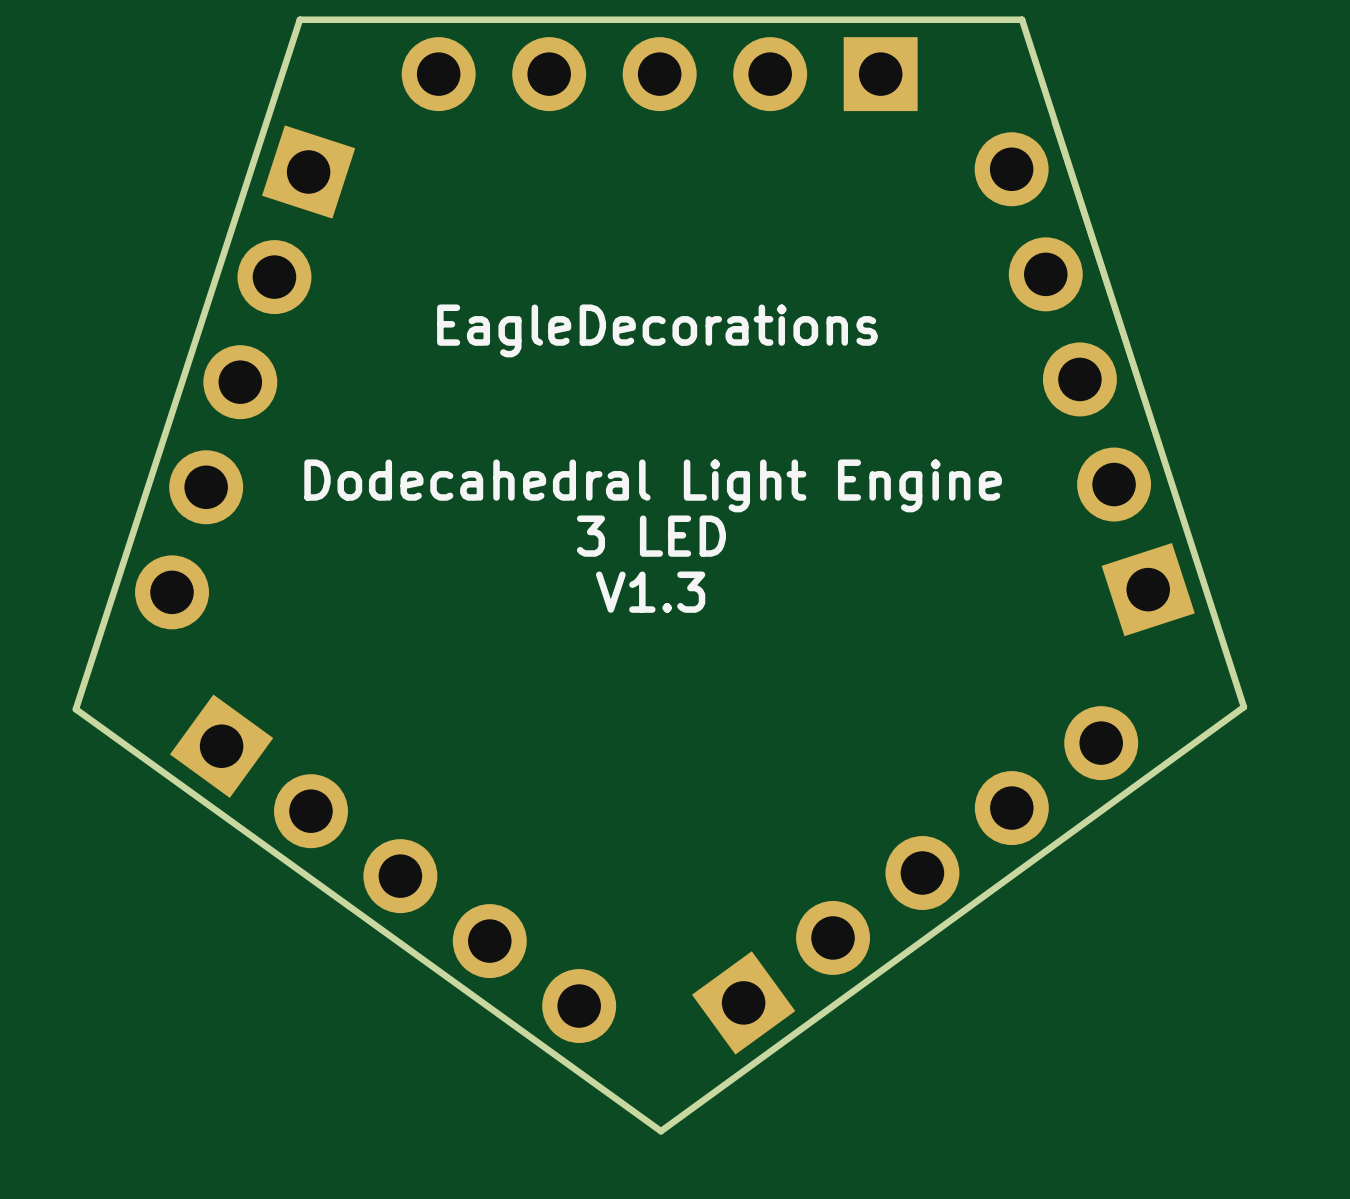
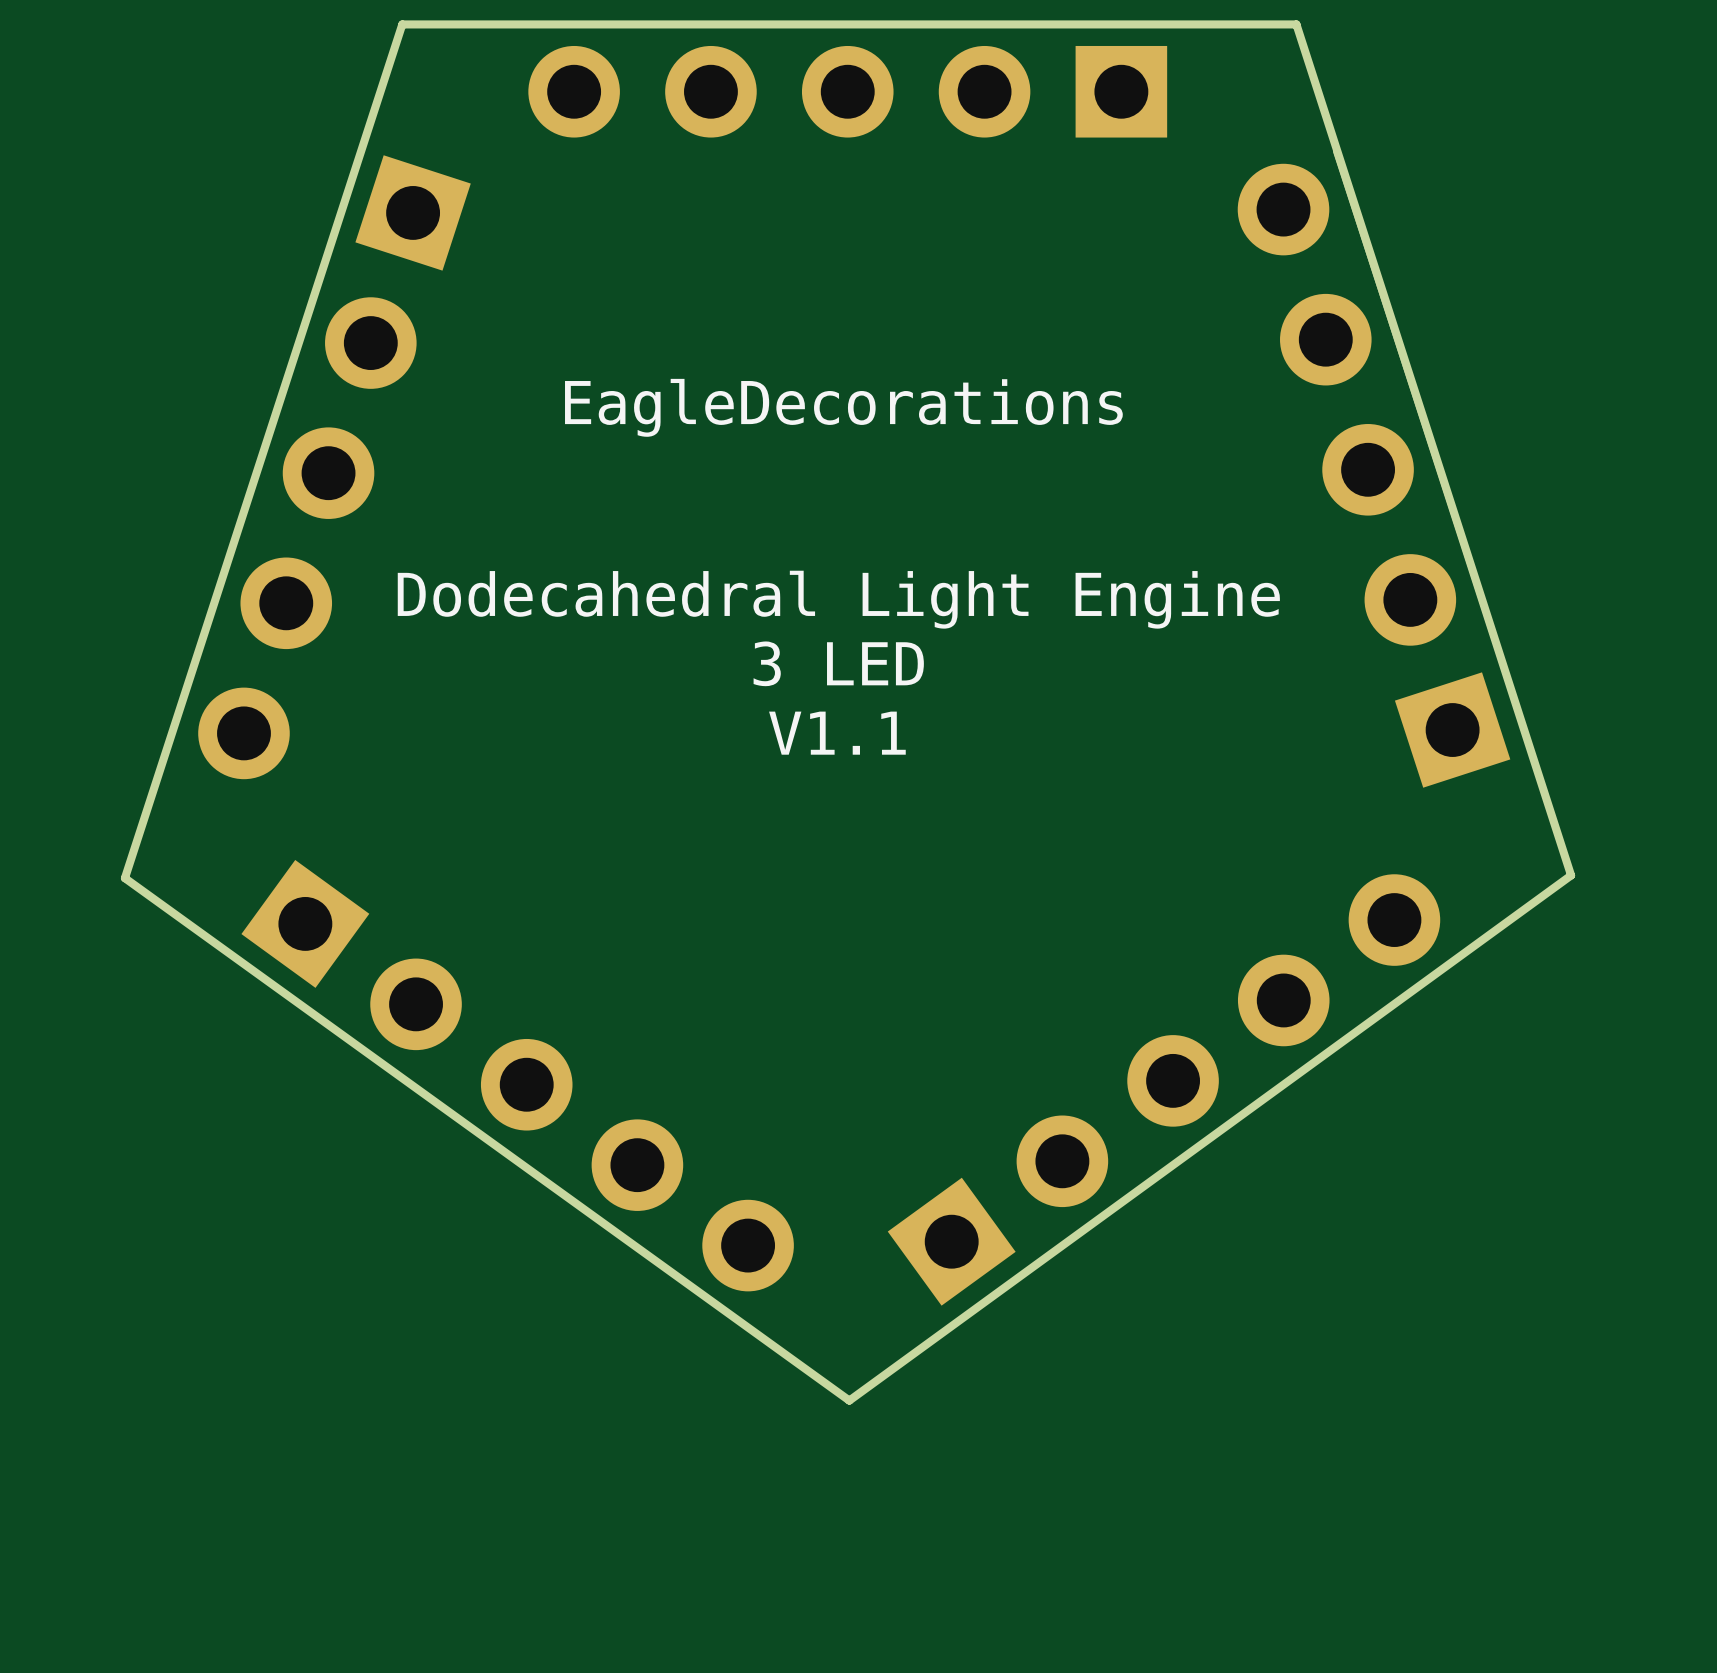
text: V1.3 (650, 592) -> V1.1 (837, 733)

